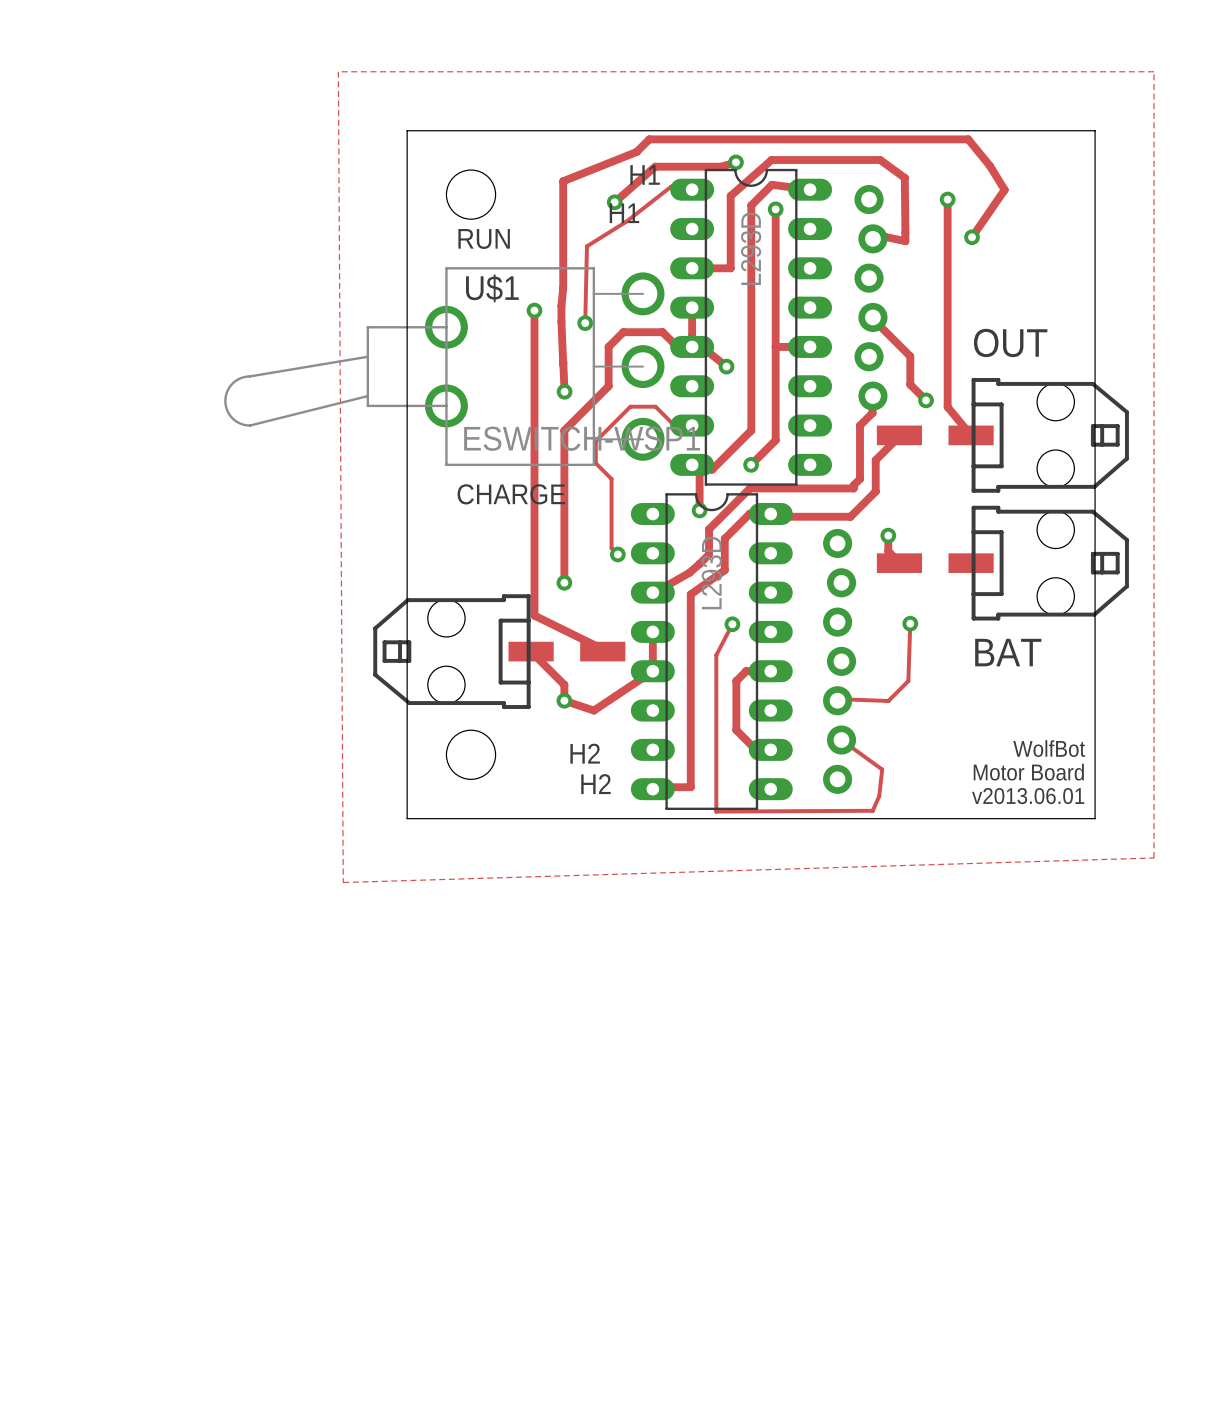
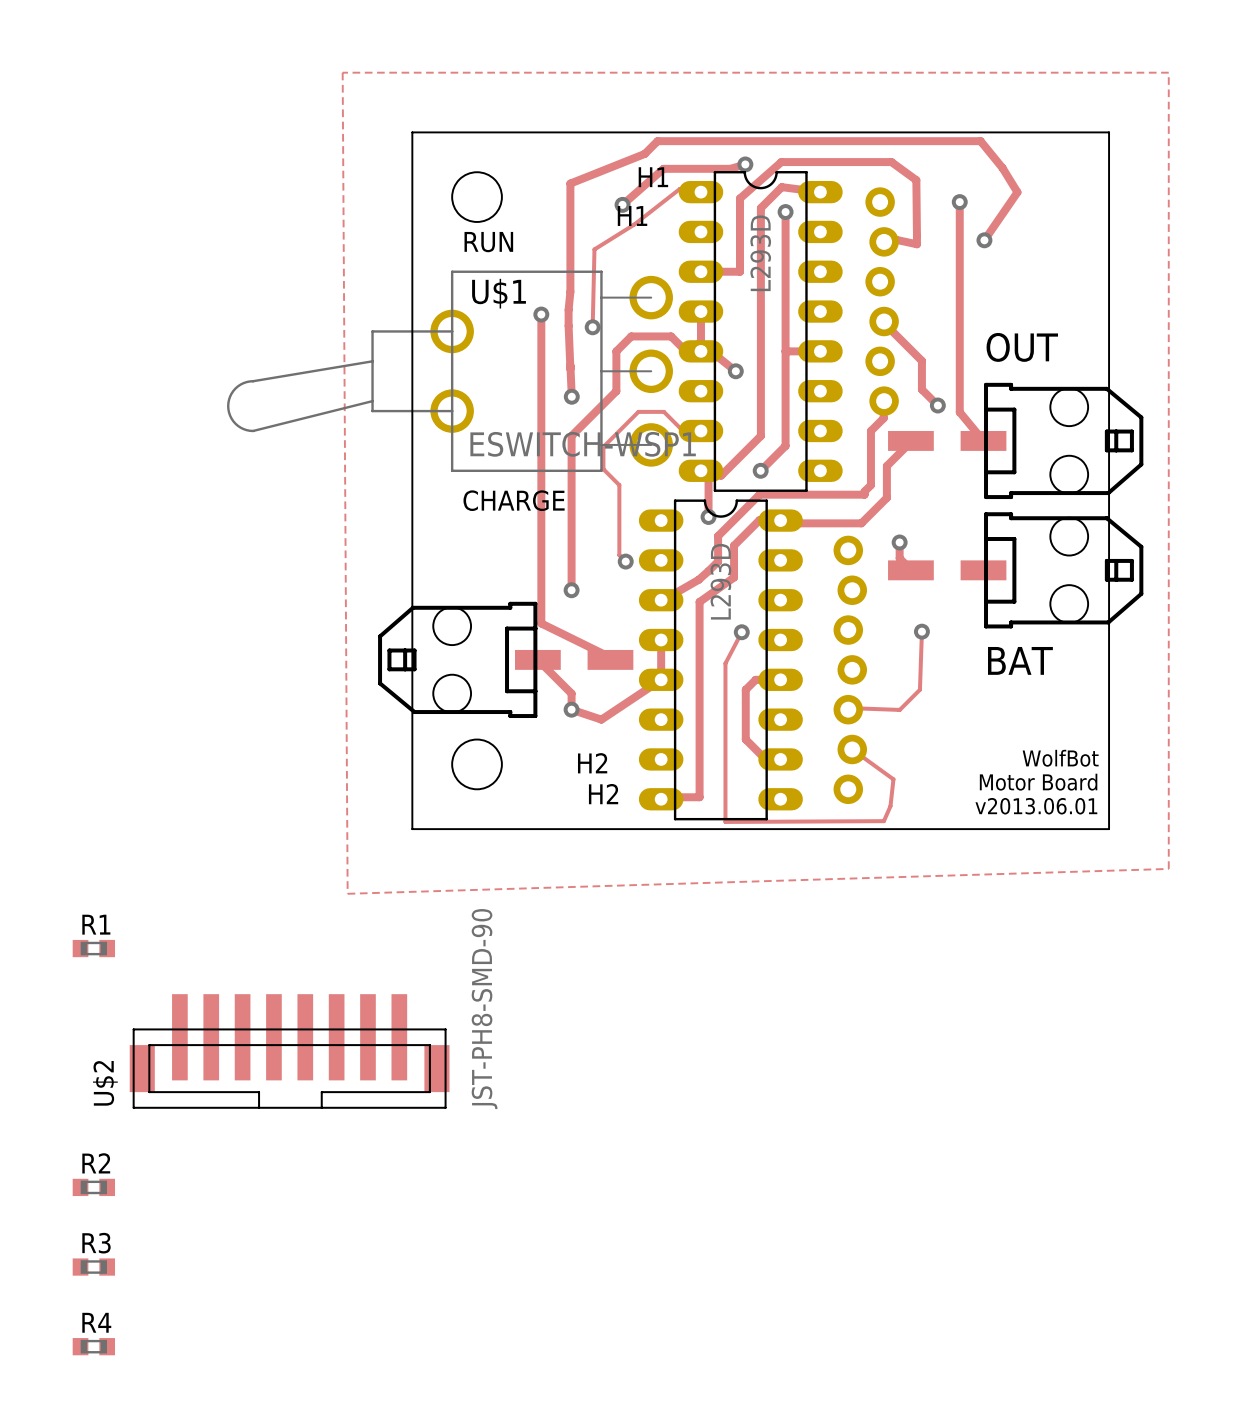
R1: none -> (93, 948)
U$2: none -> JST-PH8-SMD-90 (289, 1051)
R2: none -> (93, 1187)
R3: none -> (93, 1267)
R4: none -> (93, 1346)

